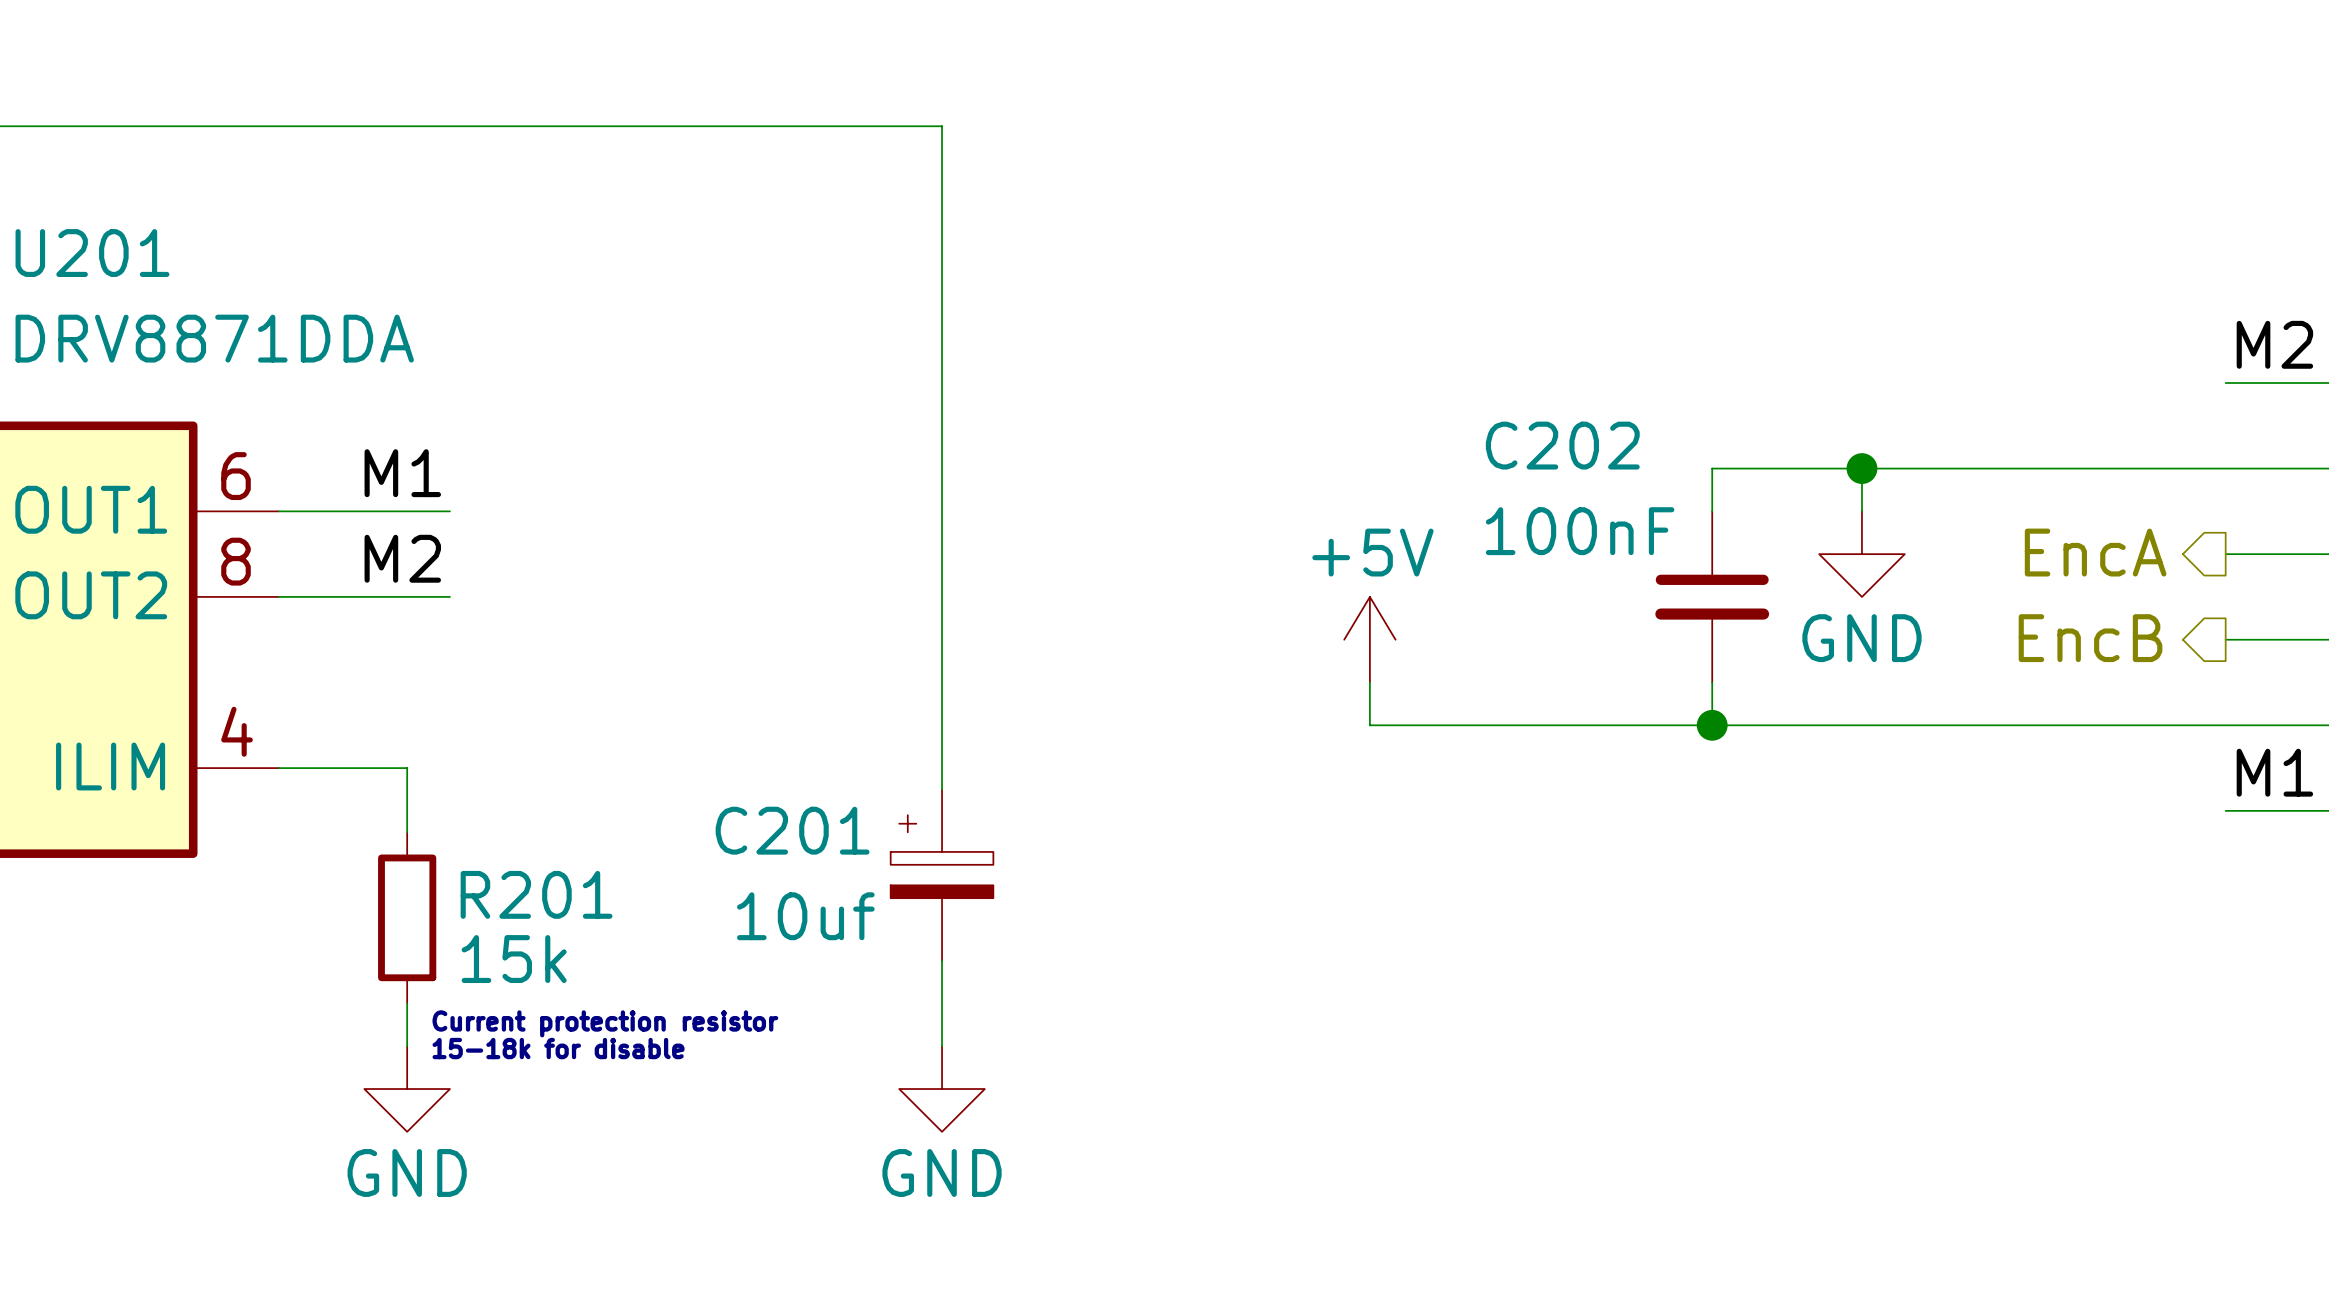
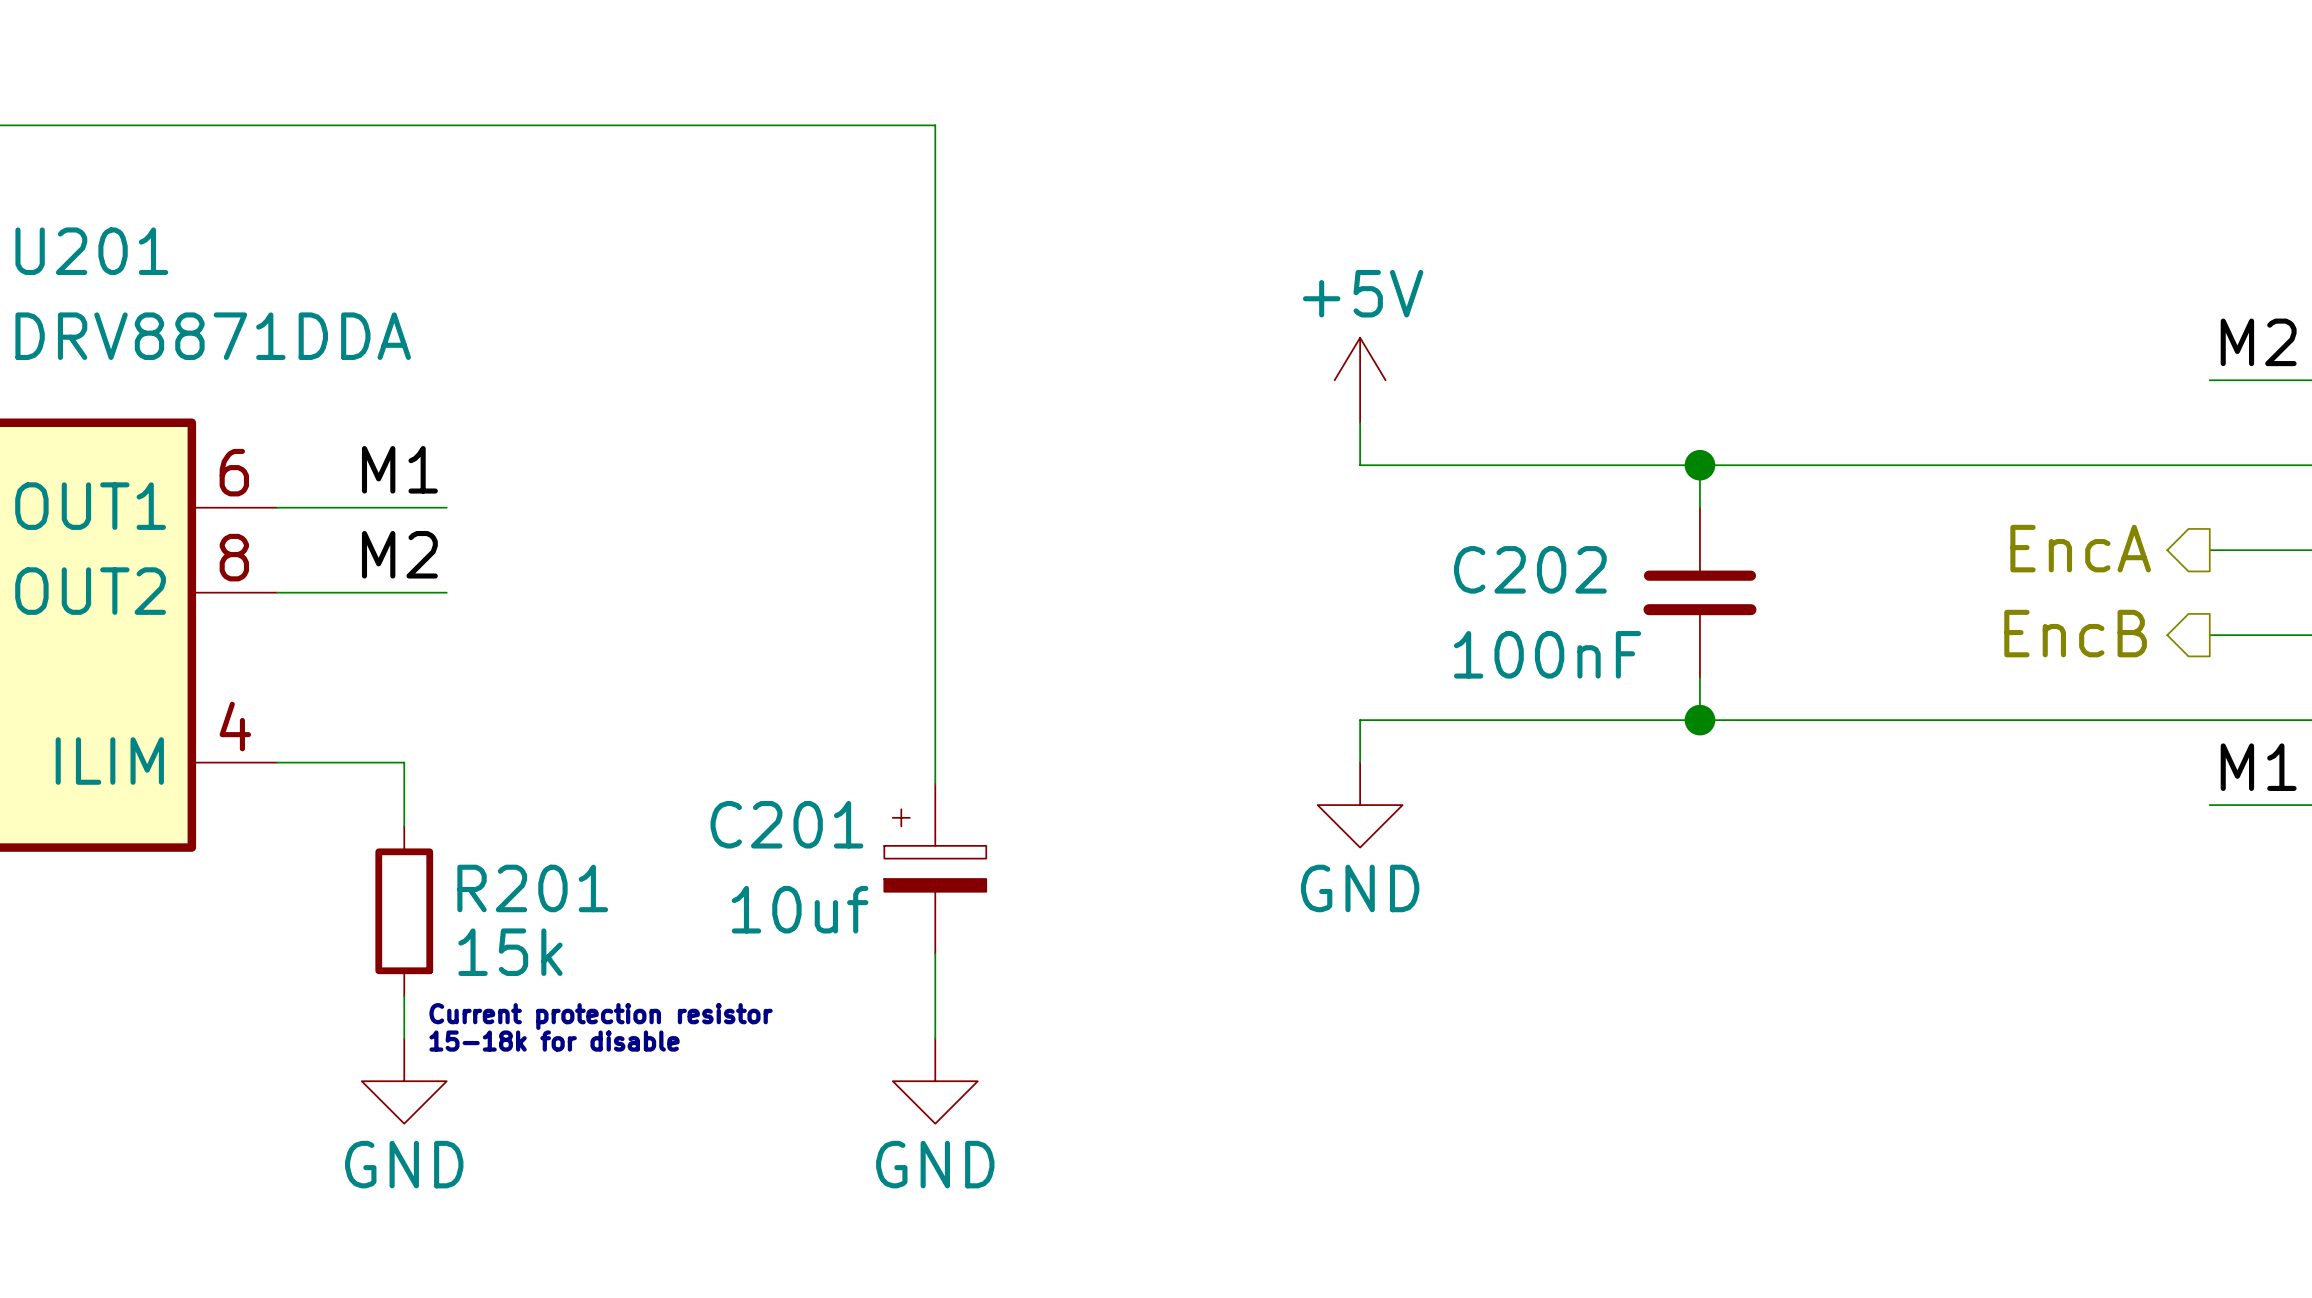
wire: none -> (1360, 422) (1360, 465) (1699, 465)
C202 name position: C202 (1562, 445) -> C202 (1530, 569)
wire: (1861, 468) (1861, 511) -> none
junction position: (1861, 468) -> (1699, 465)
C202 value position: 100nF (1580, 531) -> 100nF (1547, 654)
power symbol position: GND (1861, 554) -> GND (1360, 805)
power symbol position: +5V (1369, 639) -> +5V (1360, 380)
wire: (1369, 682) (1369, 725) -> (1360, 762) (1360, 720)

